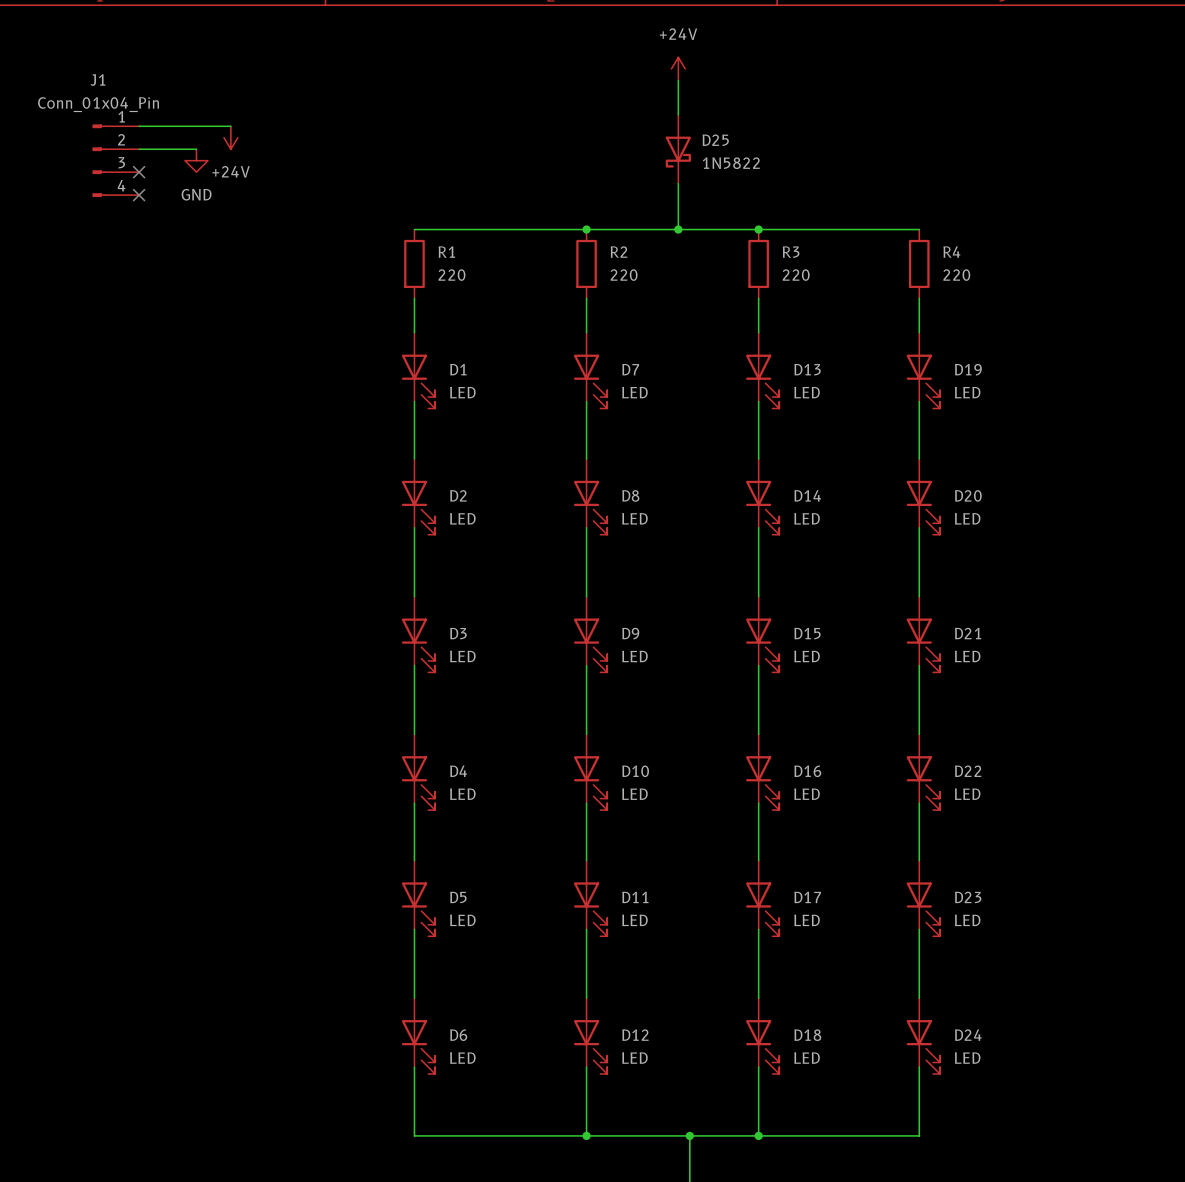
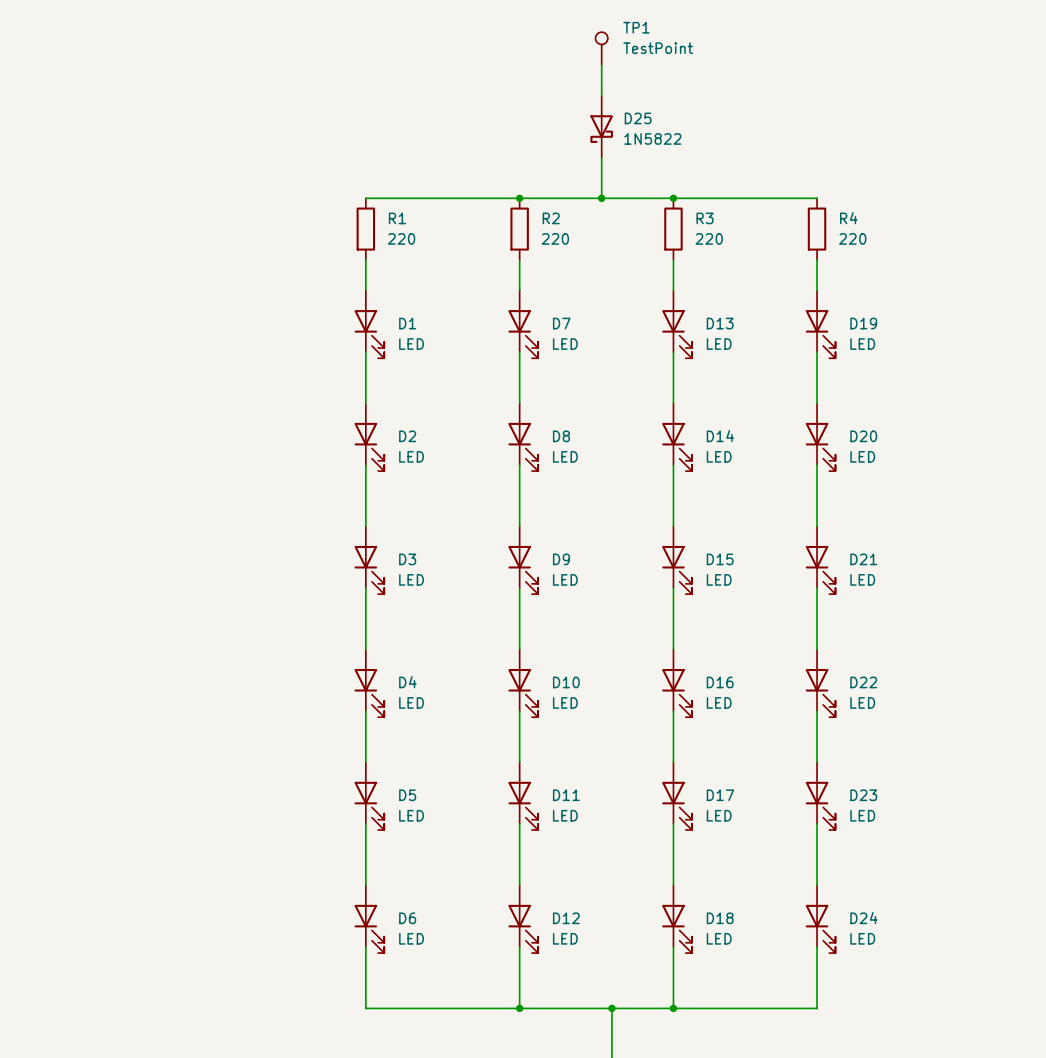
TP1: none -> TestPoint (601, 48)
power symbol: +24V (678, 68) -> none
wire: (139, 126) (230, 126) -> none
power symbol: +24V (230, 137) -> none
wire: (139, 149) (196, 149) -> none
J1: Conn_01x04_Pin (115, 160) -> none
power symbol: GND (196, 160) -> none
no-connect mark: (139, 172) -> none
no-connect mark: (139, 195) -> none

